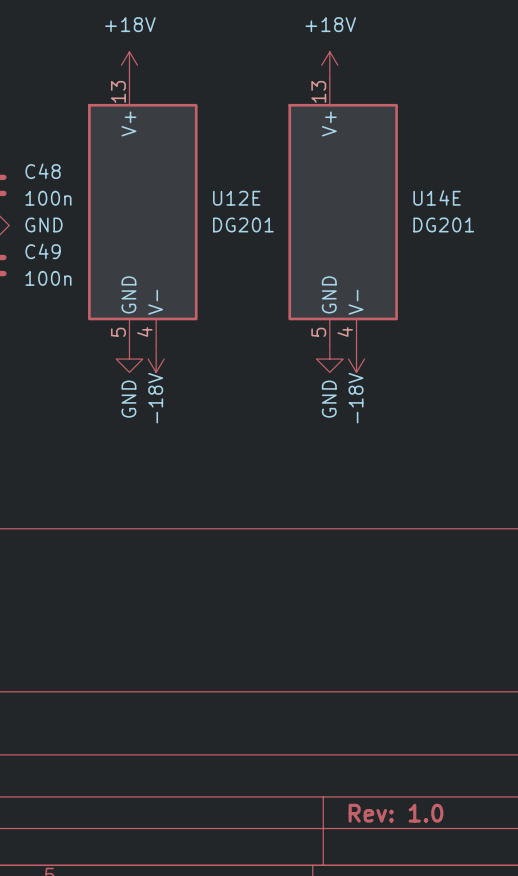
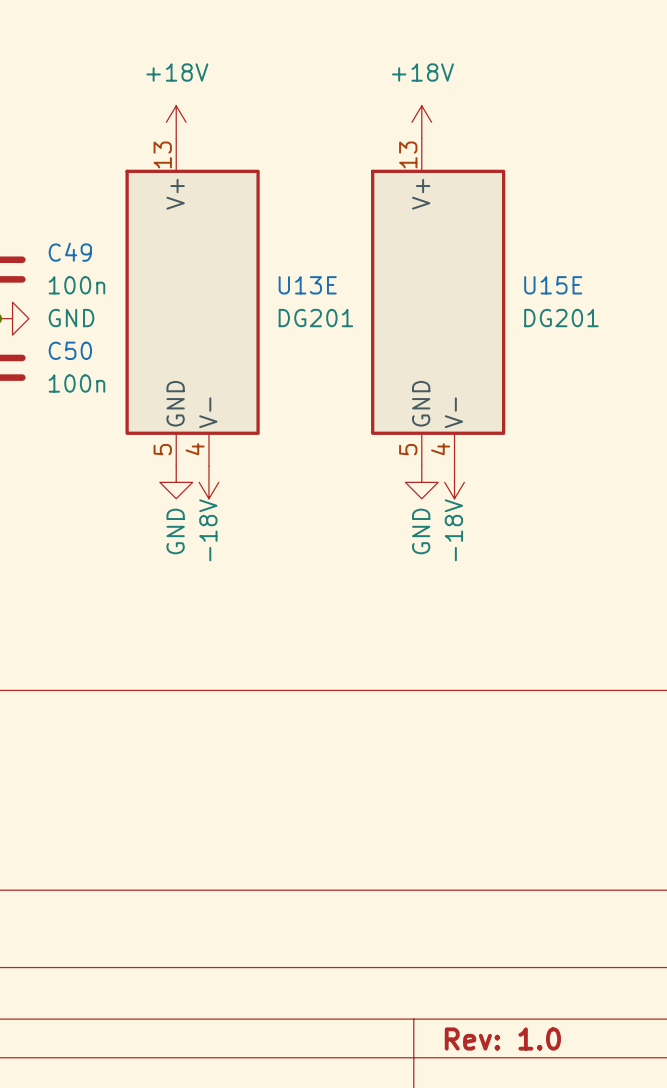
C48 name: C48 (43, 171) -> C49 (70, 252)
U14E name: U14E (437, 197) -> U15E (553, 285)
U12E name: U12E (236, 198) -> U13E (307, 285)
C49 name: C49 (43, 251) -> C50 (70, 350)

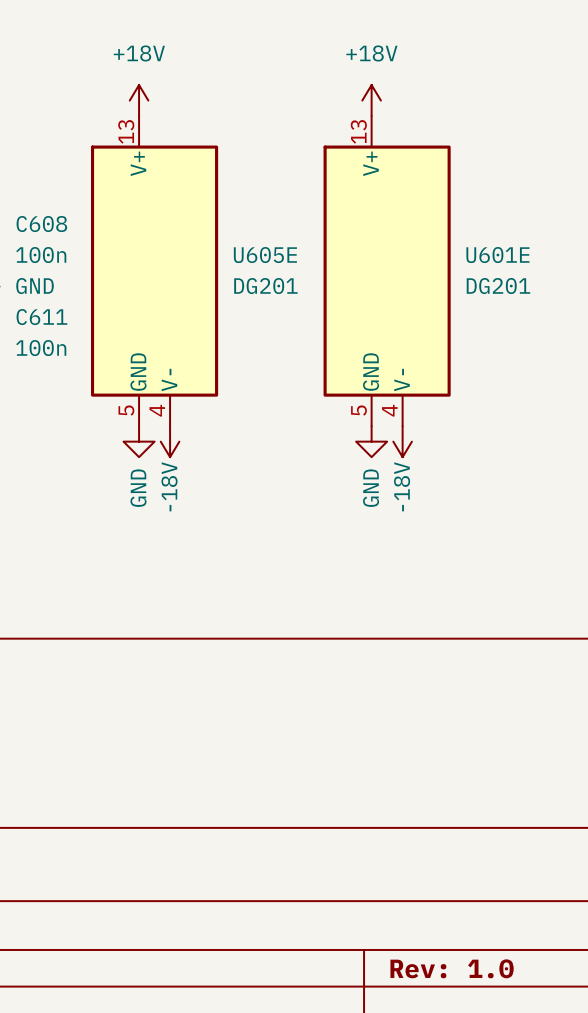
C49 name: C49 (70, 252) -> C608 (41, 224)
U13E name: U13E (307, 285) -> U605E (265, 255)
U15E name: U15E (553, 285) -> U601E (497, 255)
C50 name: C50 (70, 350) -> C611 (41, 317)

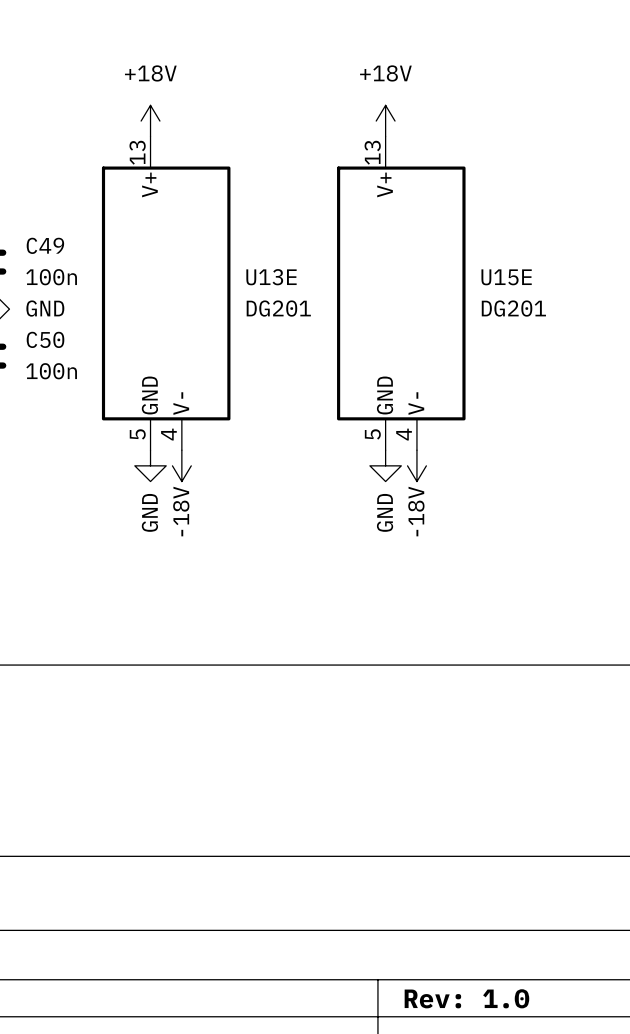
C608 name: C608 (41, 224) -> C49 (45, 245)
U605E name: U605E (265, 255) -> U13E (271, 277)
U601E name: U601E (497, 255) -> U15E (506, 277)
C611 name: C611 (41, 317) -> C50 (45, 339)

